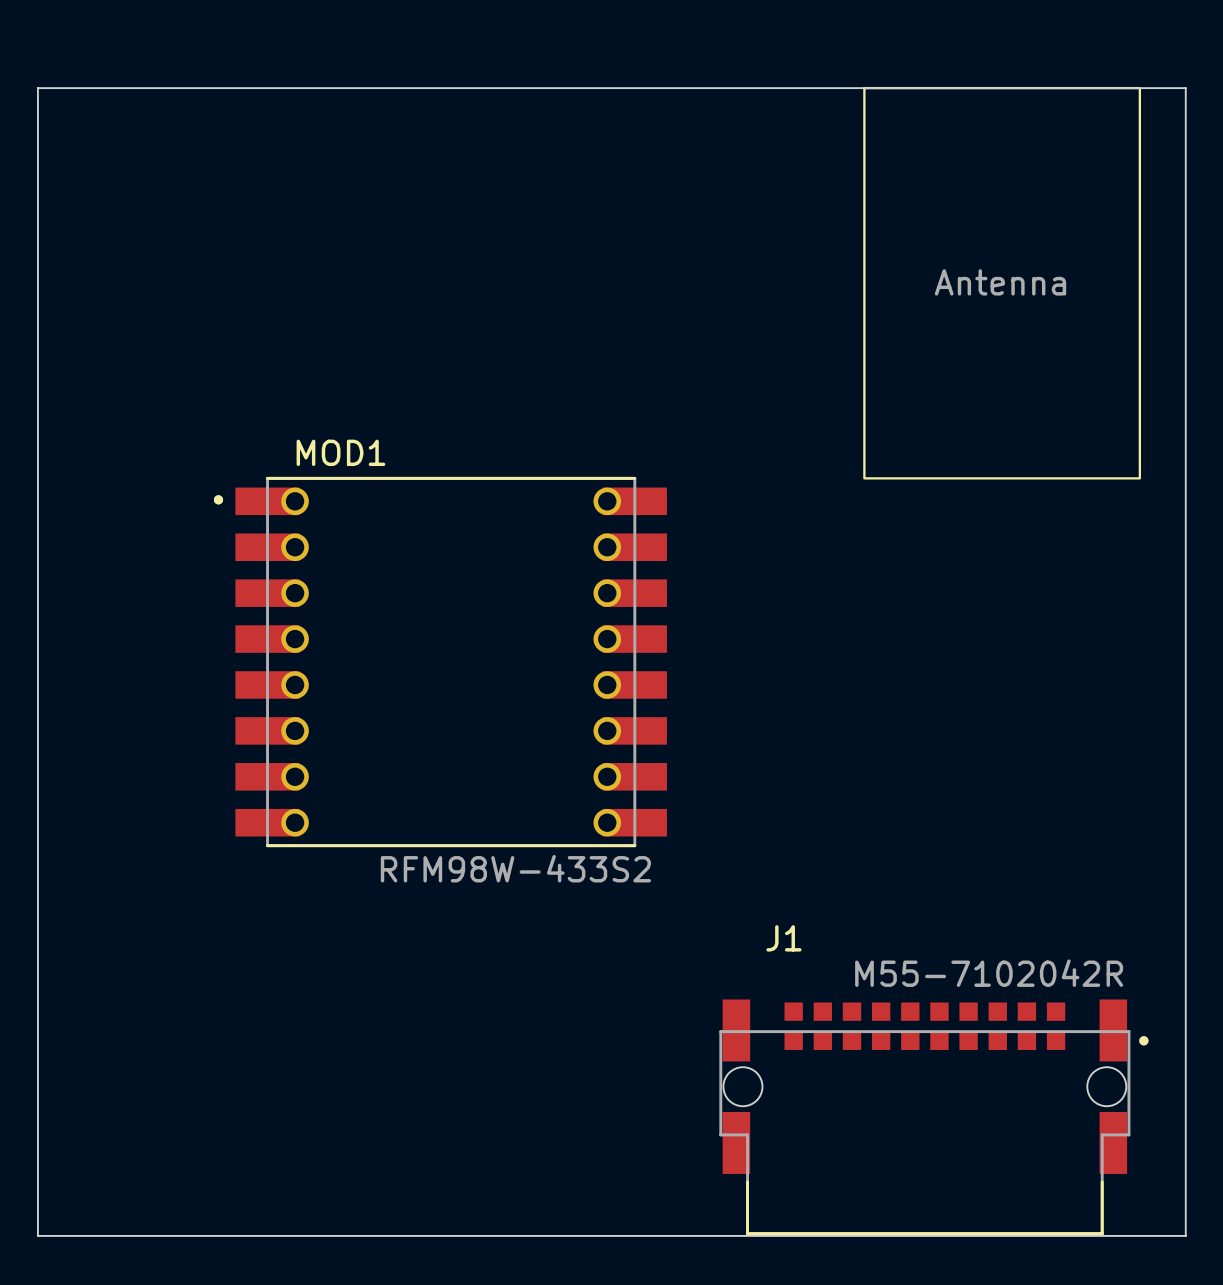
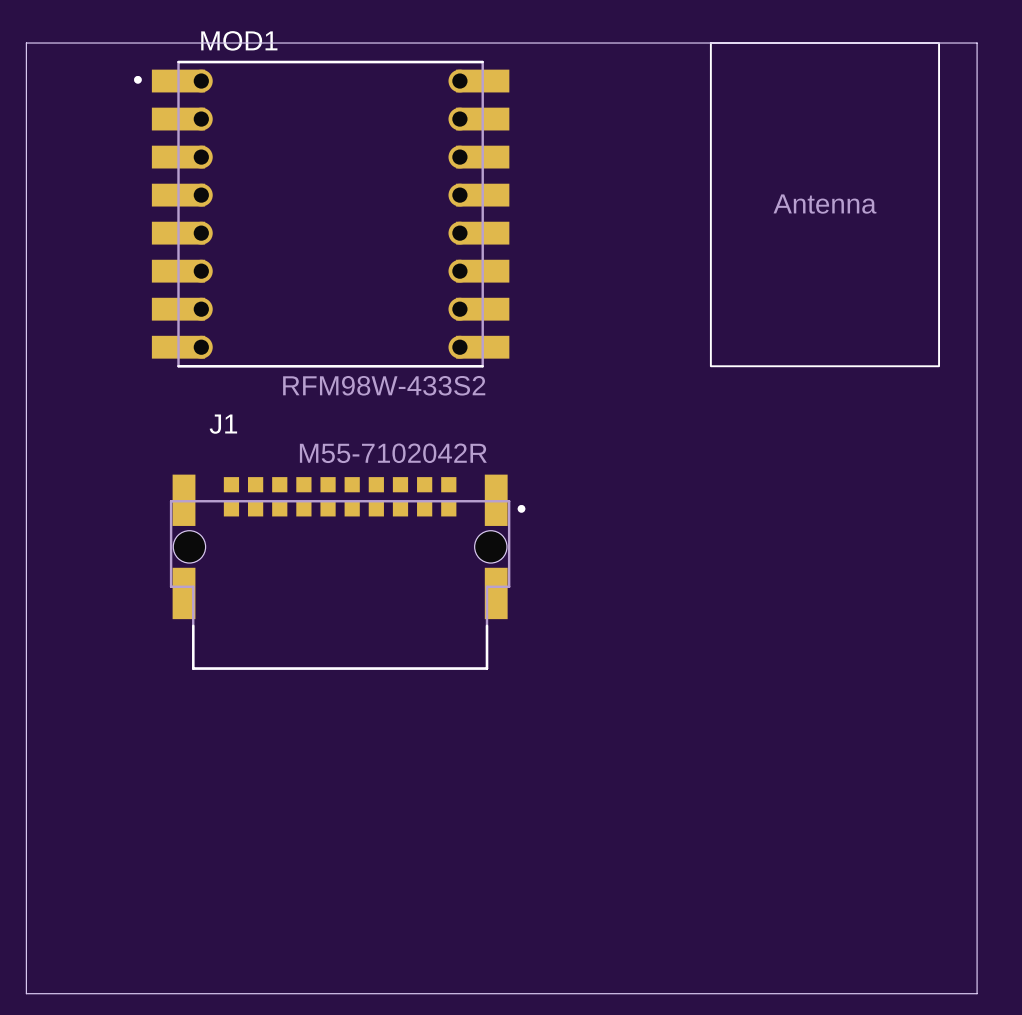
MOD1 position: (440, 662) -> (321, 214)
J1 position: (933, 1117) -> (347, 572)

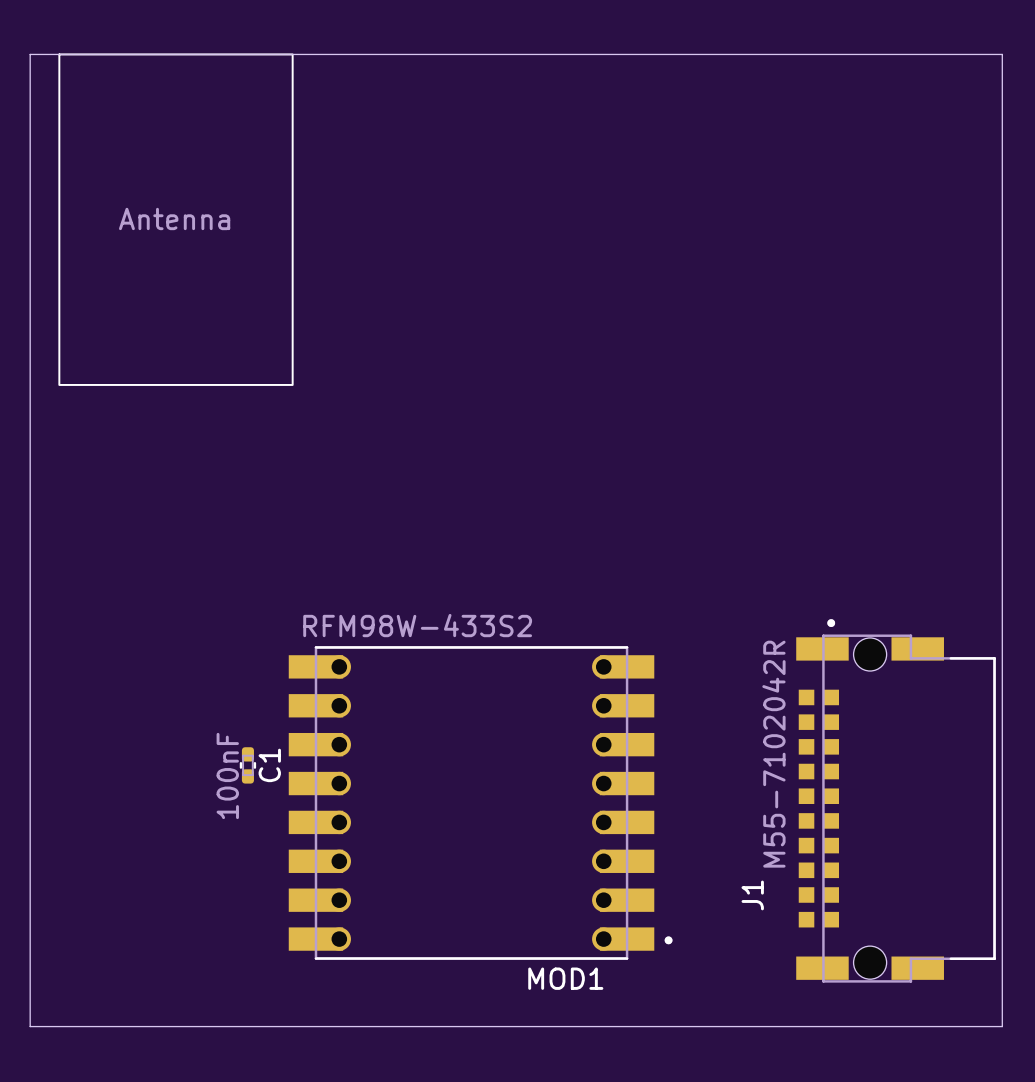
drawing: none -> [58, 53, 294, 386]
drawing: [709, 42, 941, 368] -> none
MOD1 rotation: 0° (321, 214) -> 180° (480, 802)
MOD1 position: (321, 214) -> (480, 802)
J1 rotation: 0° (347, 572) -> 90° counterclockwise (895, 800)
J1 position: (347, 572) -> (895, 800)
C1: none -> 100nF (247, 765)

